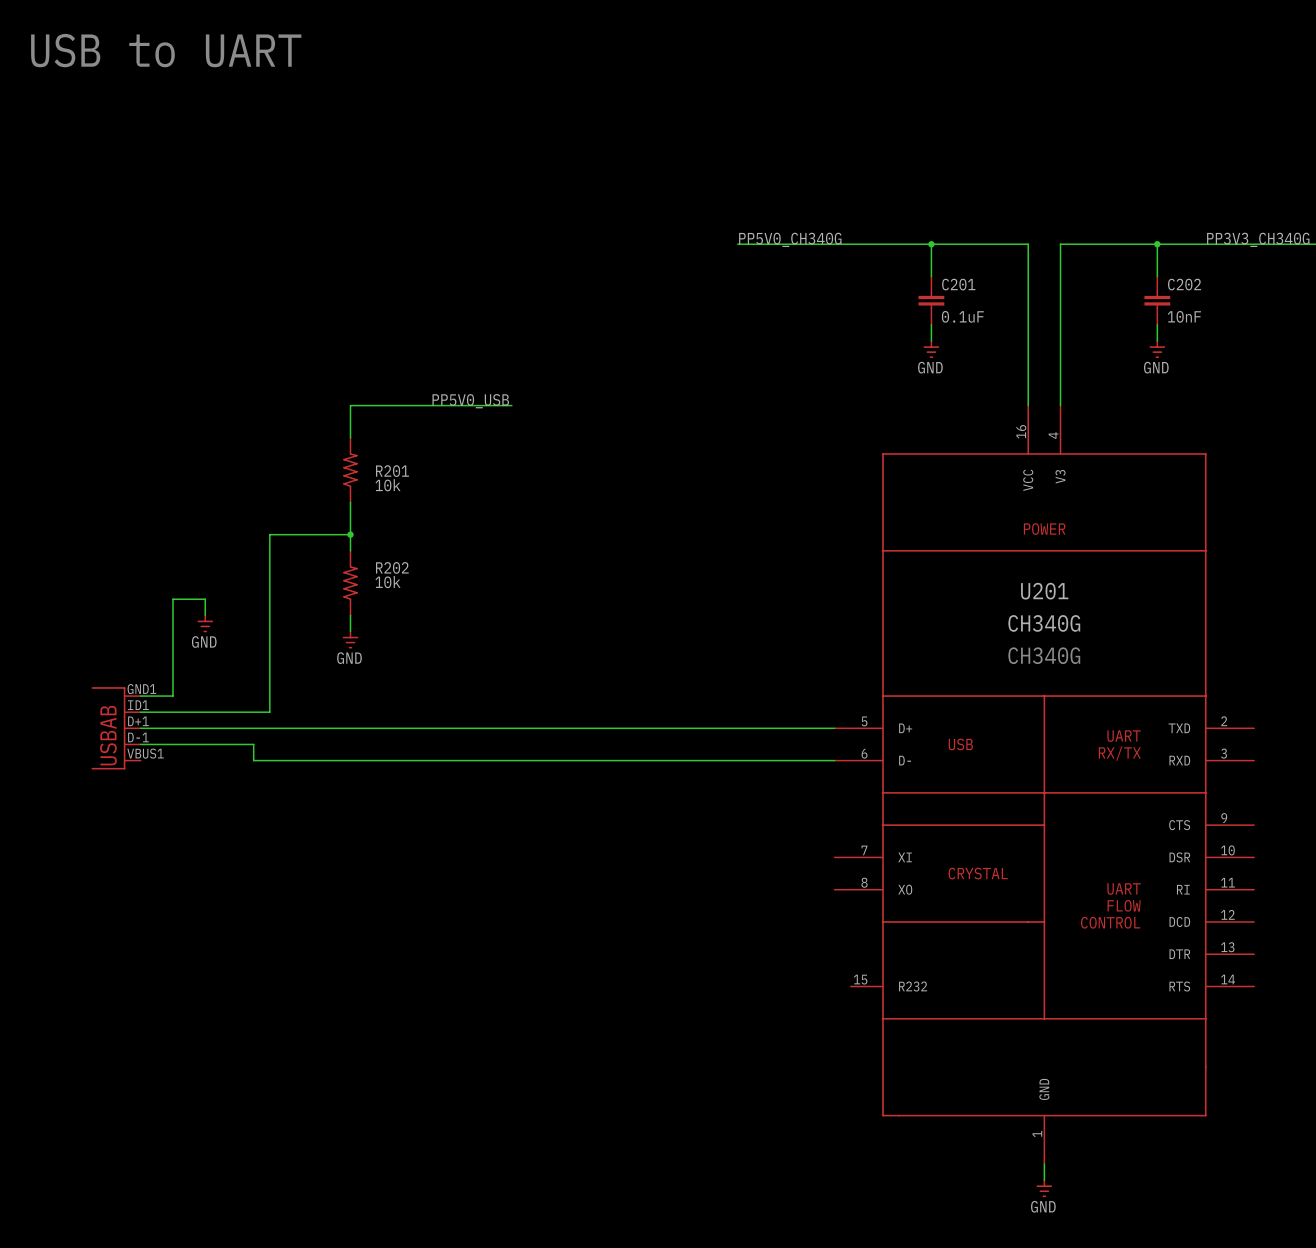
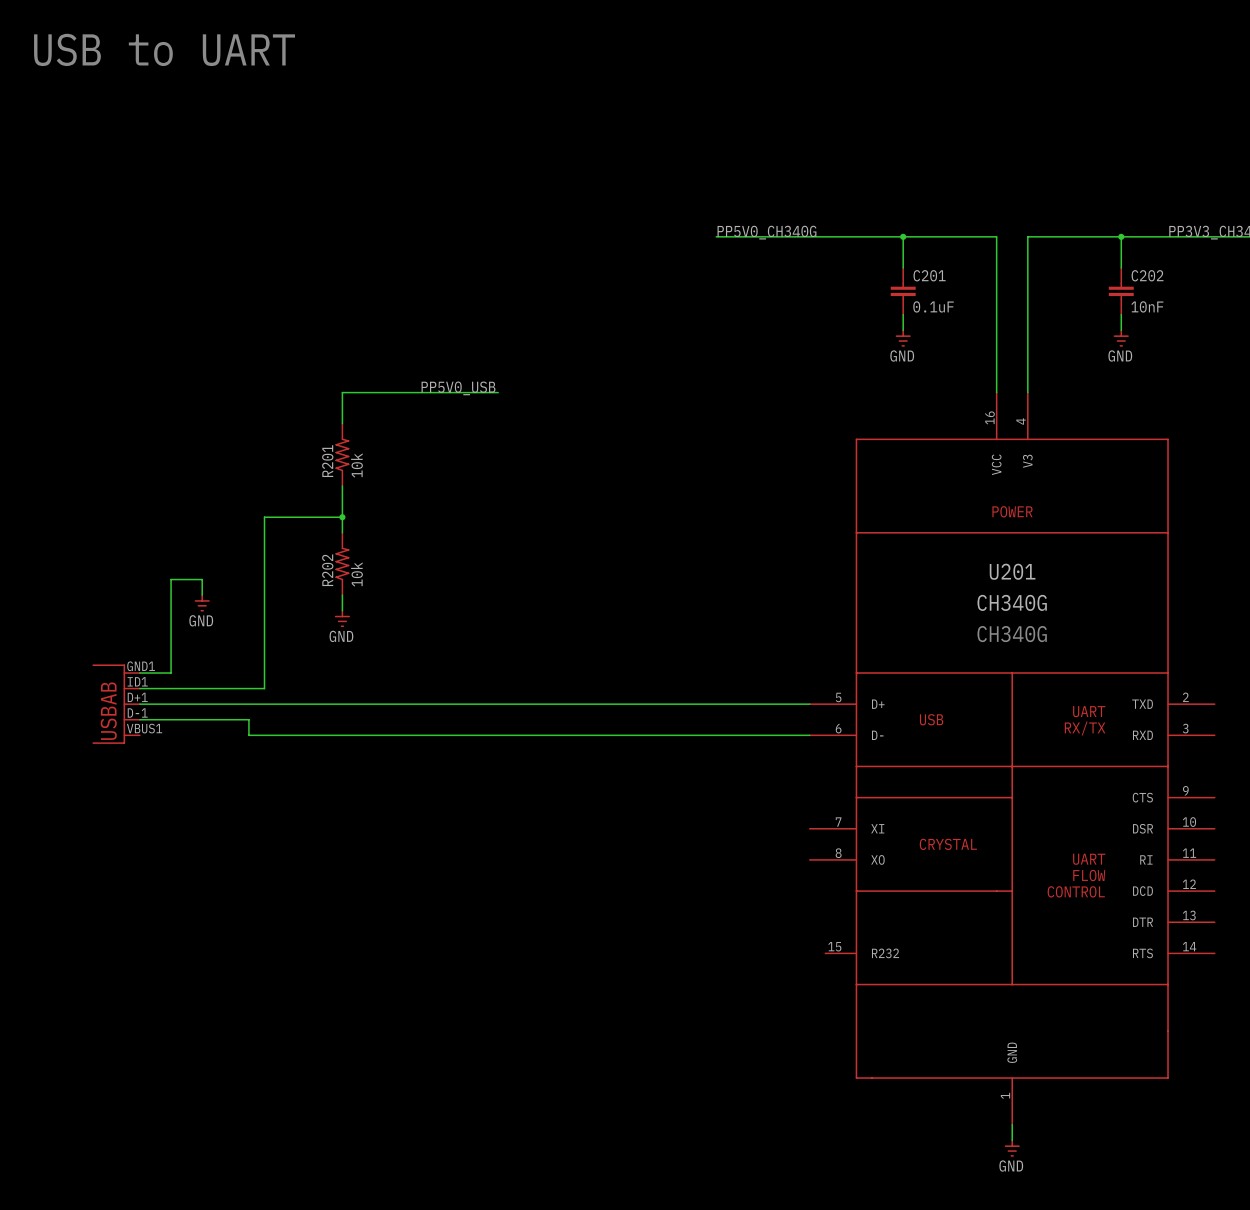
R201 name rotation: 0° (392, 471) -> 90° counterclockwise (327, 461)
R201 name position: R201 (392, 471) -> R201 (327, 461)
R201 value rotation: 0° (388, 485) -> 90° counterclockwise (356, 465)
R202 name rotation: 0° (392, 567) -> 90° counterclockwise (327, 570)
R202 name position: R202 (392, 567) -> R202 (327, 570)
R202 value rotation: 0° (388, 582) -> 90° counterclockwise (356, 574)

